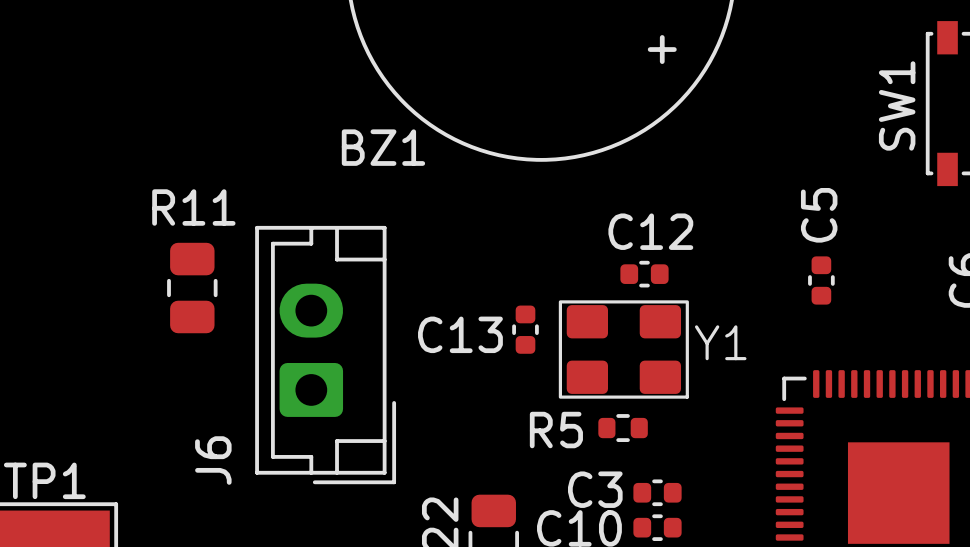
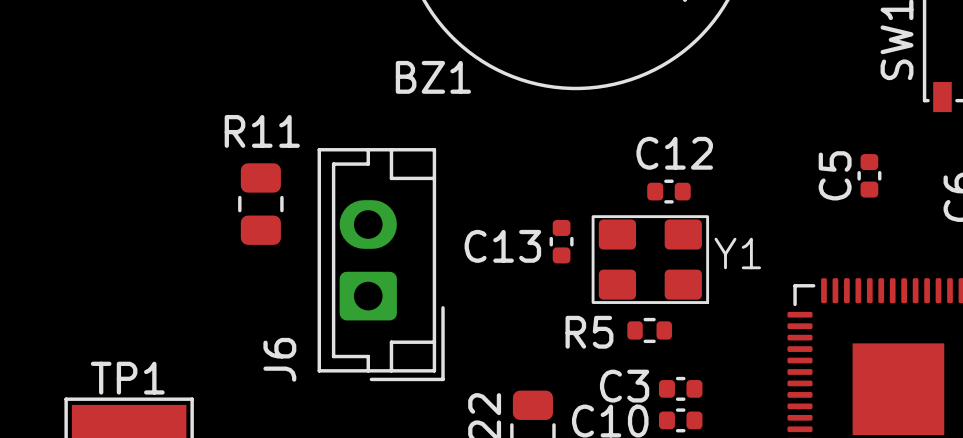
C5 name position: C5 (819, 215) -> C5 (835, 175)
C5 position: (821, 280) -> (869, 175)

